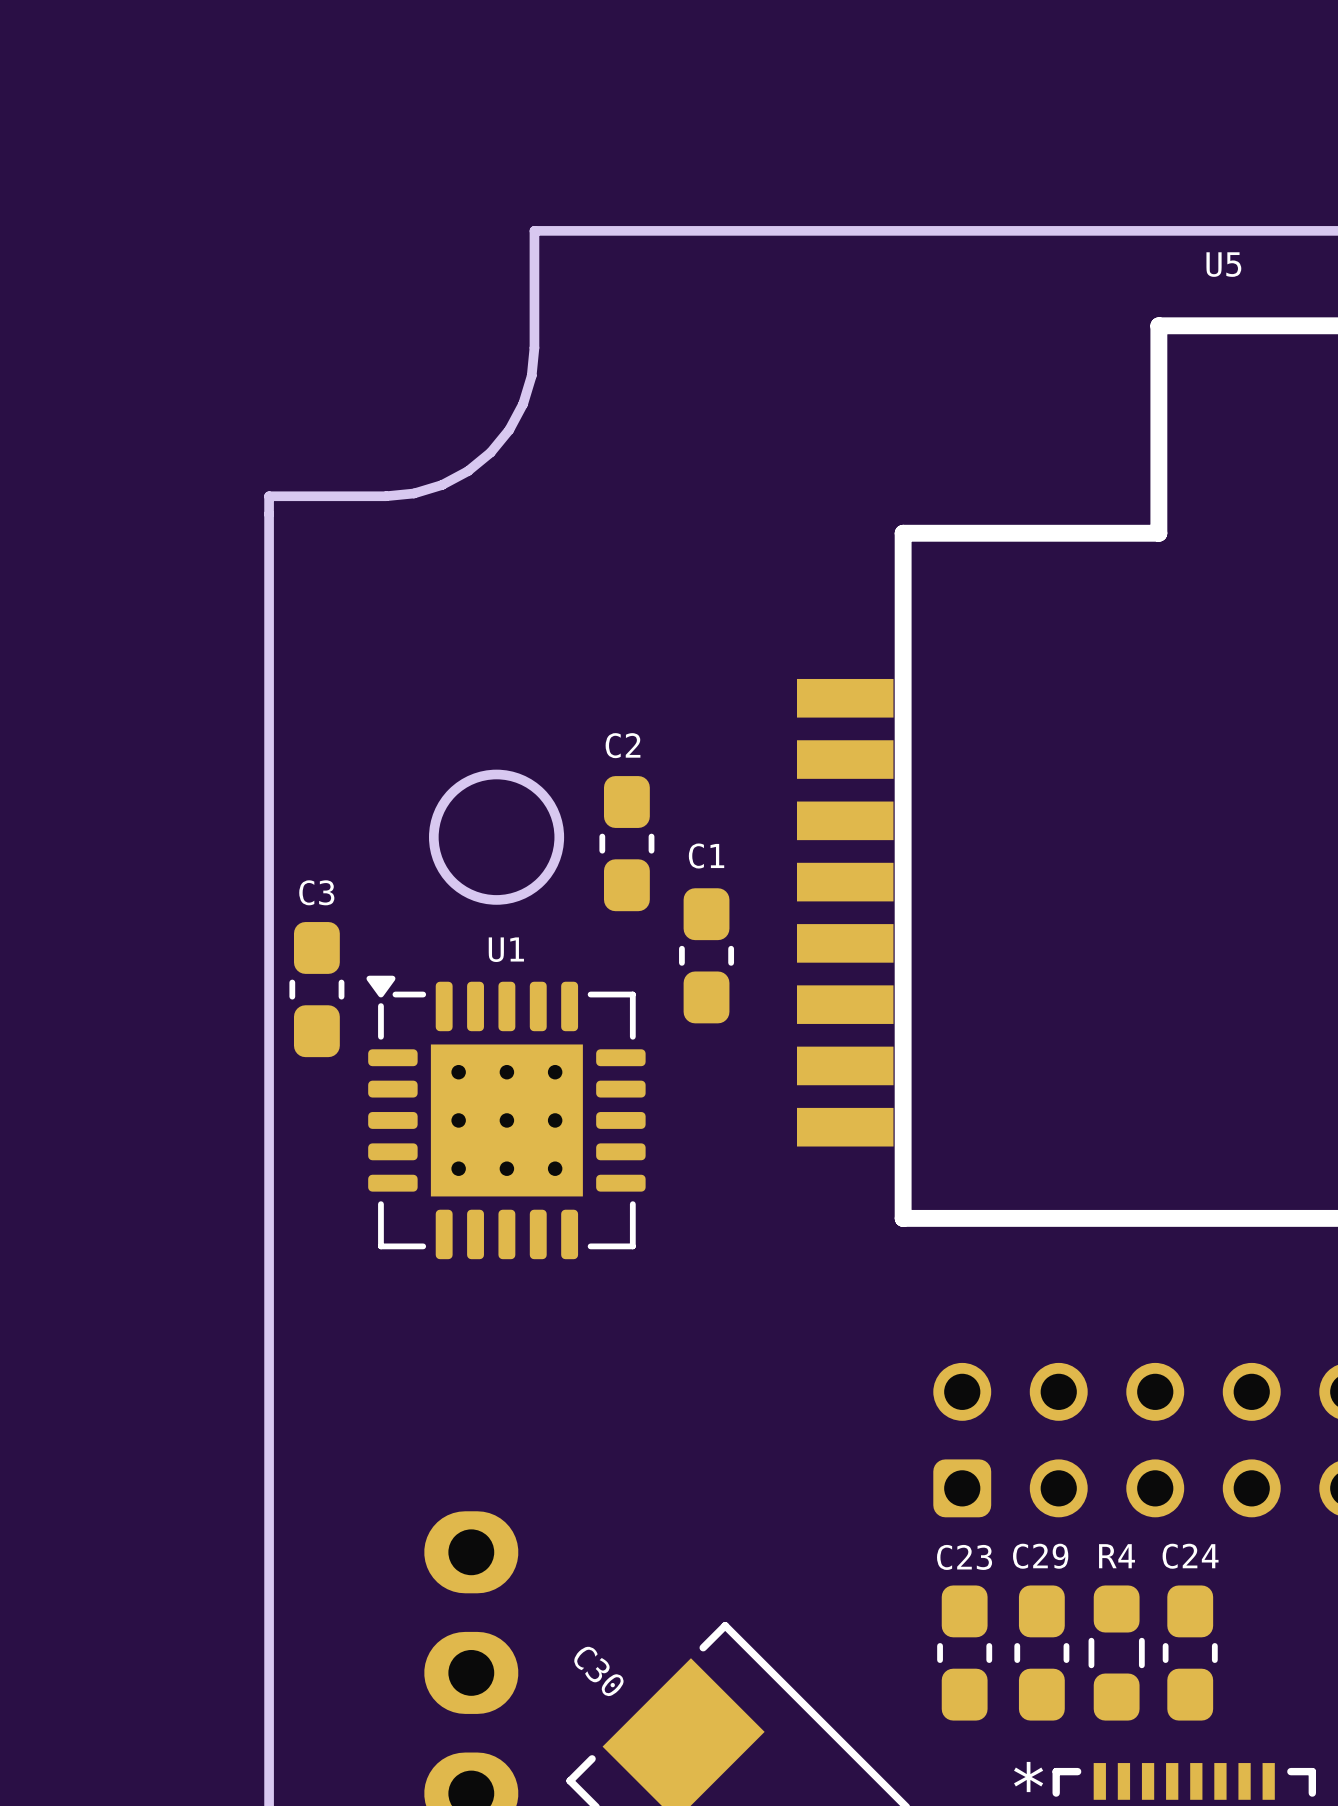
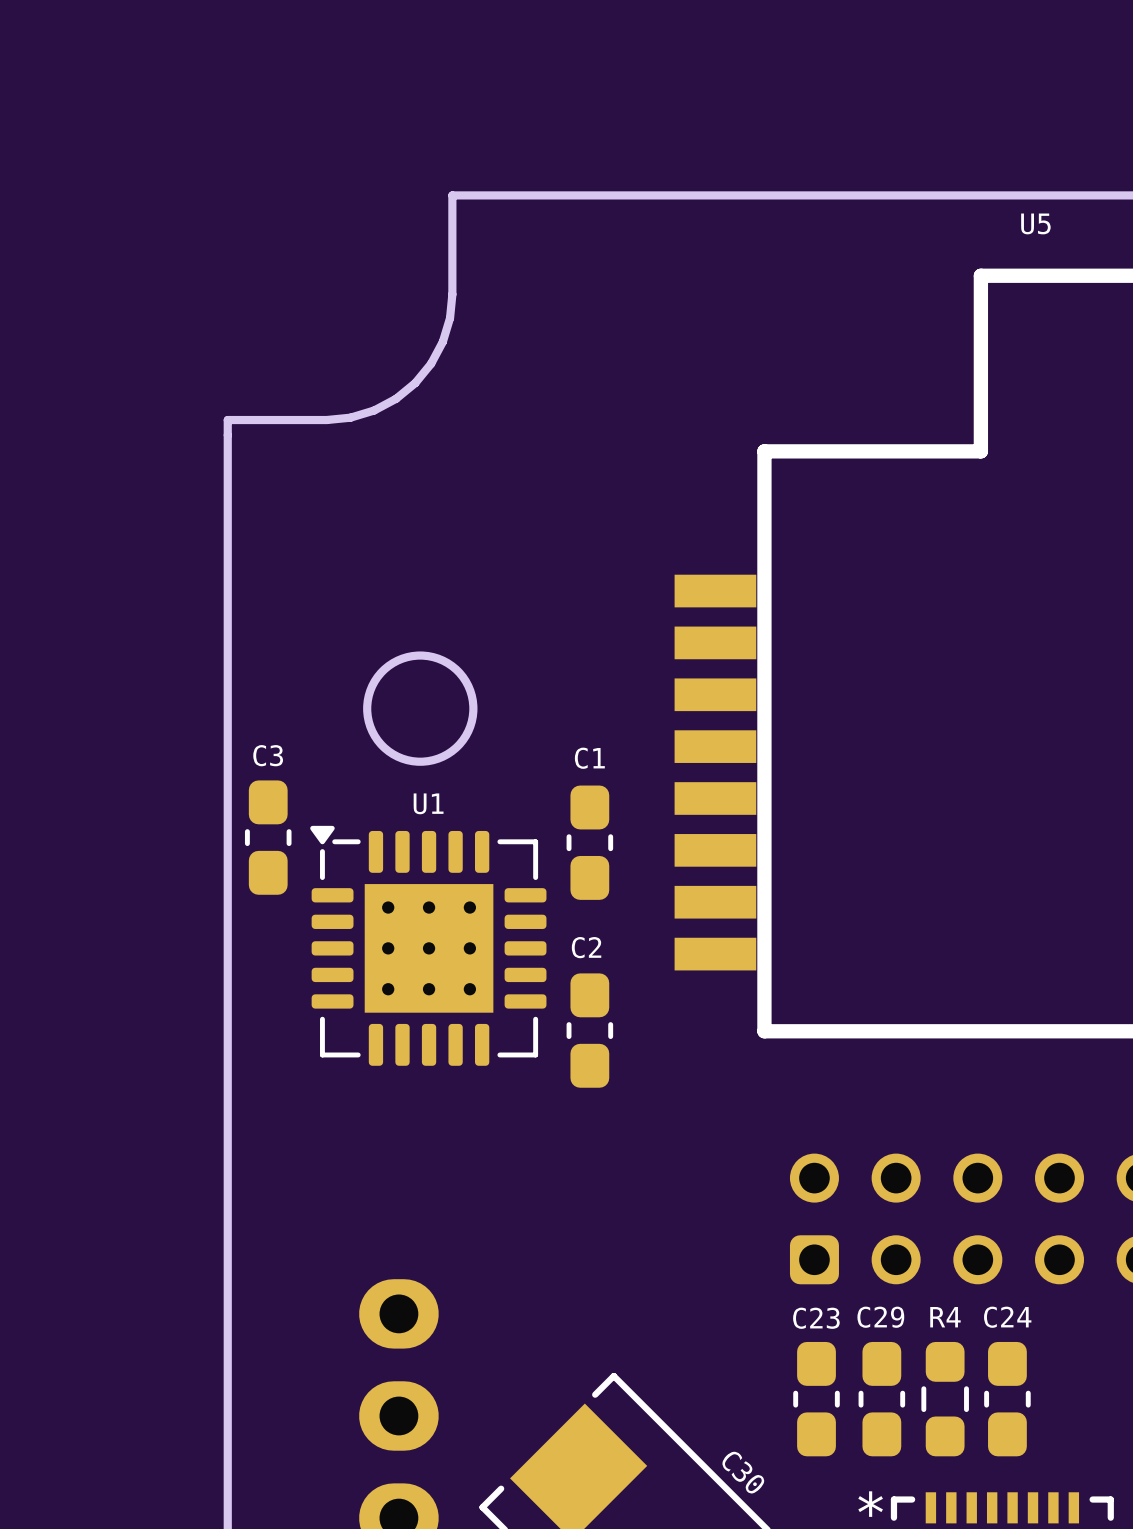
C2 position: (626, 843) -> (589, 1030)
C1 position: (706, 955) -> (589, 842)
C30 name position: C30 (599, 1671) -> C30 (743, 1472)

